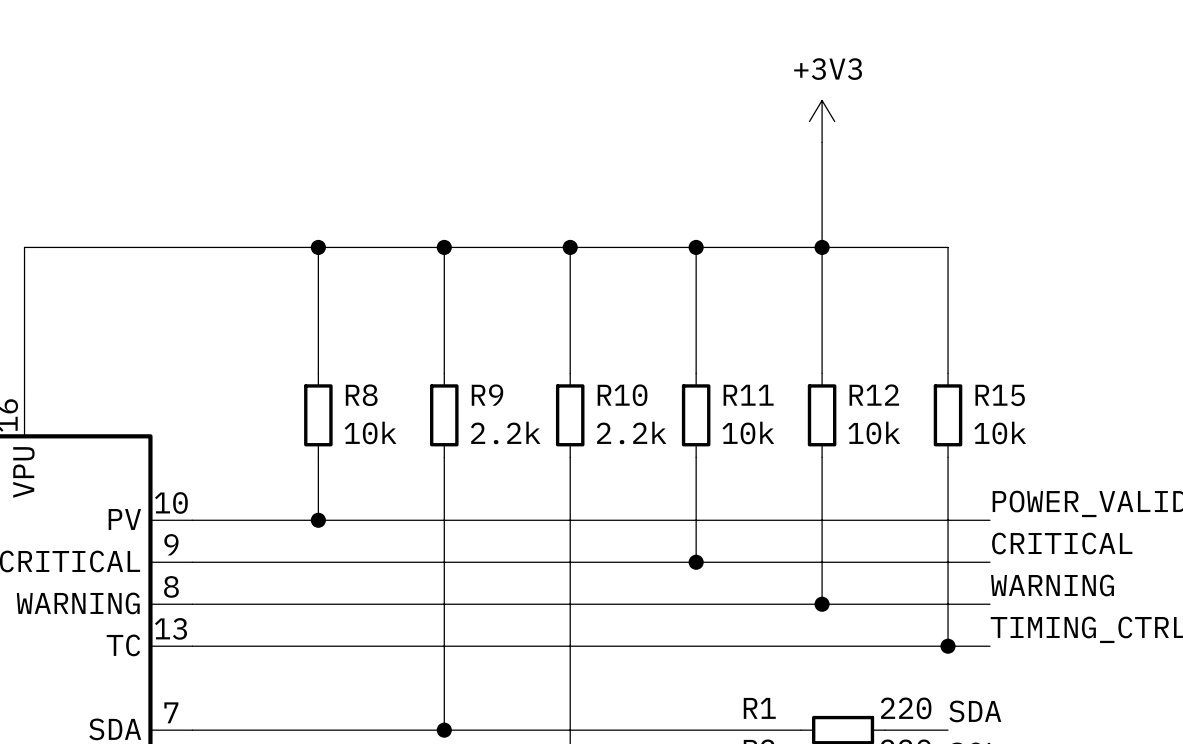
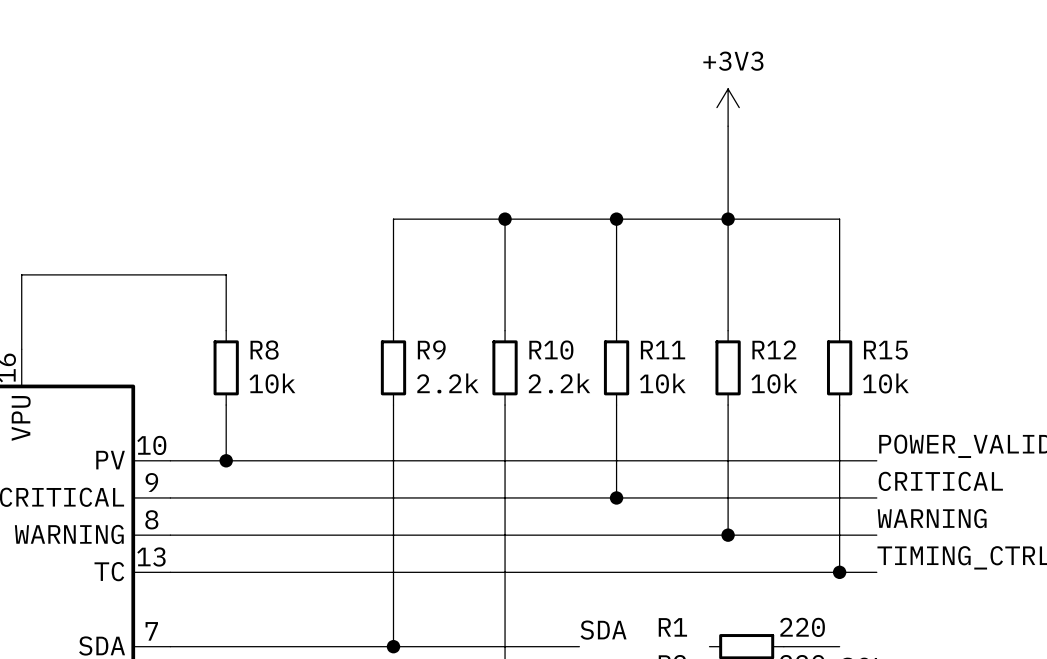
wire: (318, 247) (318, 373) -> none
junction: (318, 247) -> none
wire: (444, 247) (24, 247) (24, 310) -> (226, 330) (226, 274) (21, 274)
junction: (444, 247) -> none
R8 position: (318, 415) -> (226, 367)
wire: (318, 457) (318, 520) -> (226, 405) (226, 460)
junction position: (318, 520) -> (226, 460)
label position: SDA (975, 711) -> SDA (603, 630)
wire: (654, 730) (801, 730) -> none

